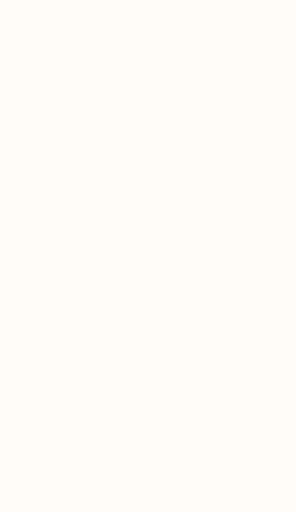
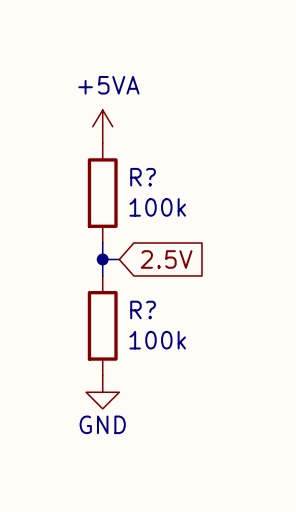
power symbol: none -> +5VA (102, 126)
R?: none -> 100k (102, 193)
wire: none -> (102, 242) (102, 276)
wire: none -> (102, 259) (119, 259)
junction: none -> (102, 259)
global label: none -> 2.5V (166, 259)
R?: none -> 100k (102, 325)
power symbol: none -> GND (102, 392)

